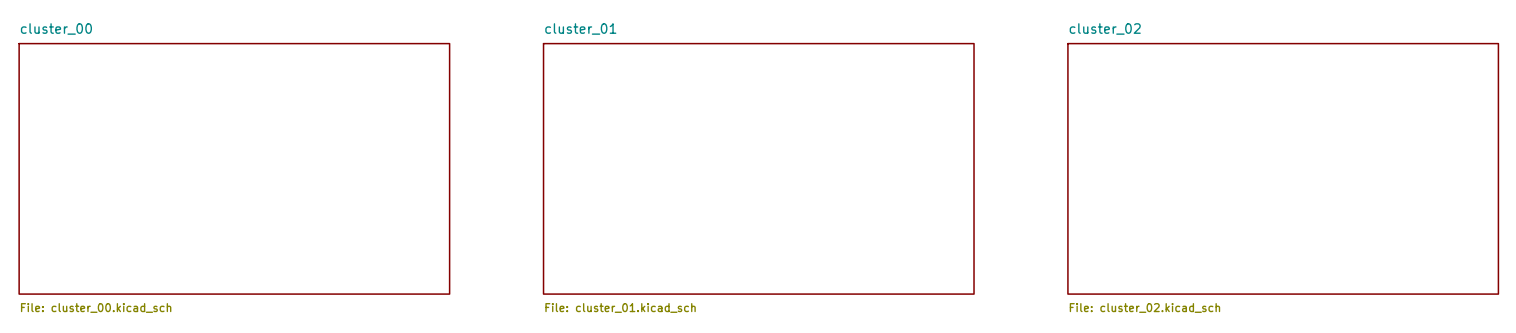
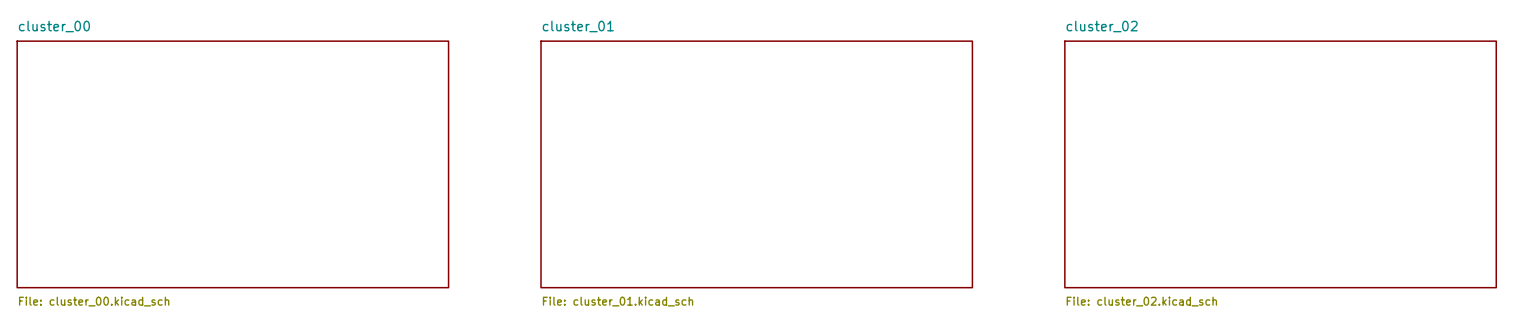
sheet cluster_00 shape: [18, 43, 451, 295] -> [16, 40, 450, 289]
sheet cluster_01 shape: [543, 43, 975, 295] -> [540, 40, 973, 289]
sheet cluster_02 shape: [1067, 43, 1499, 295] -> [1064, 40, 1497, 289]

